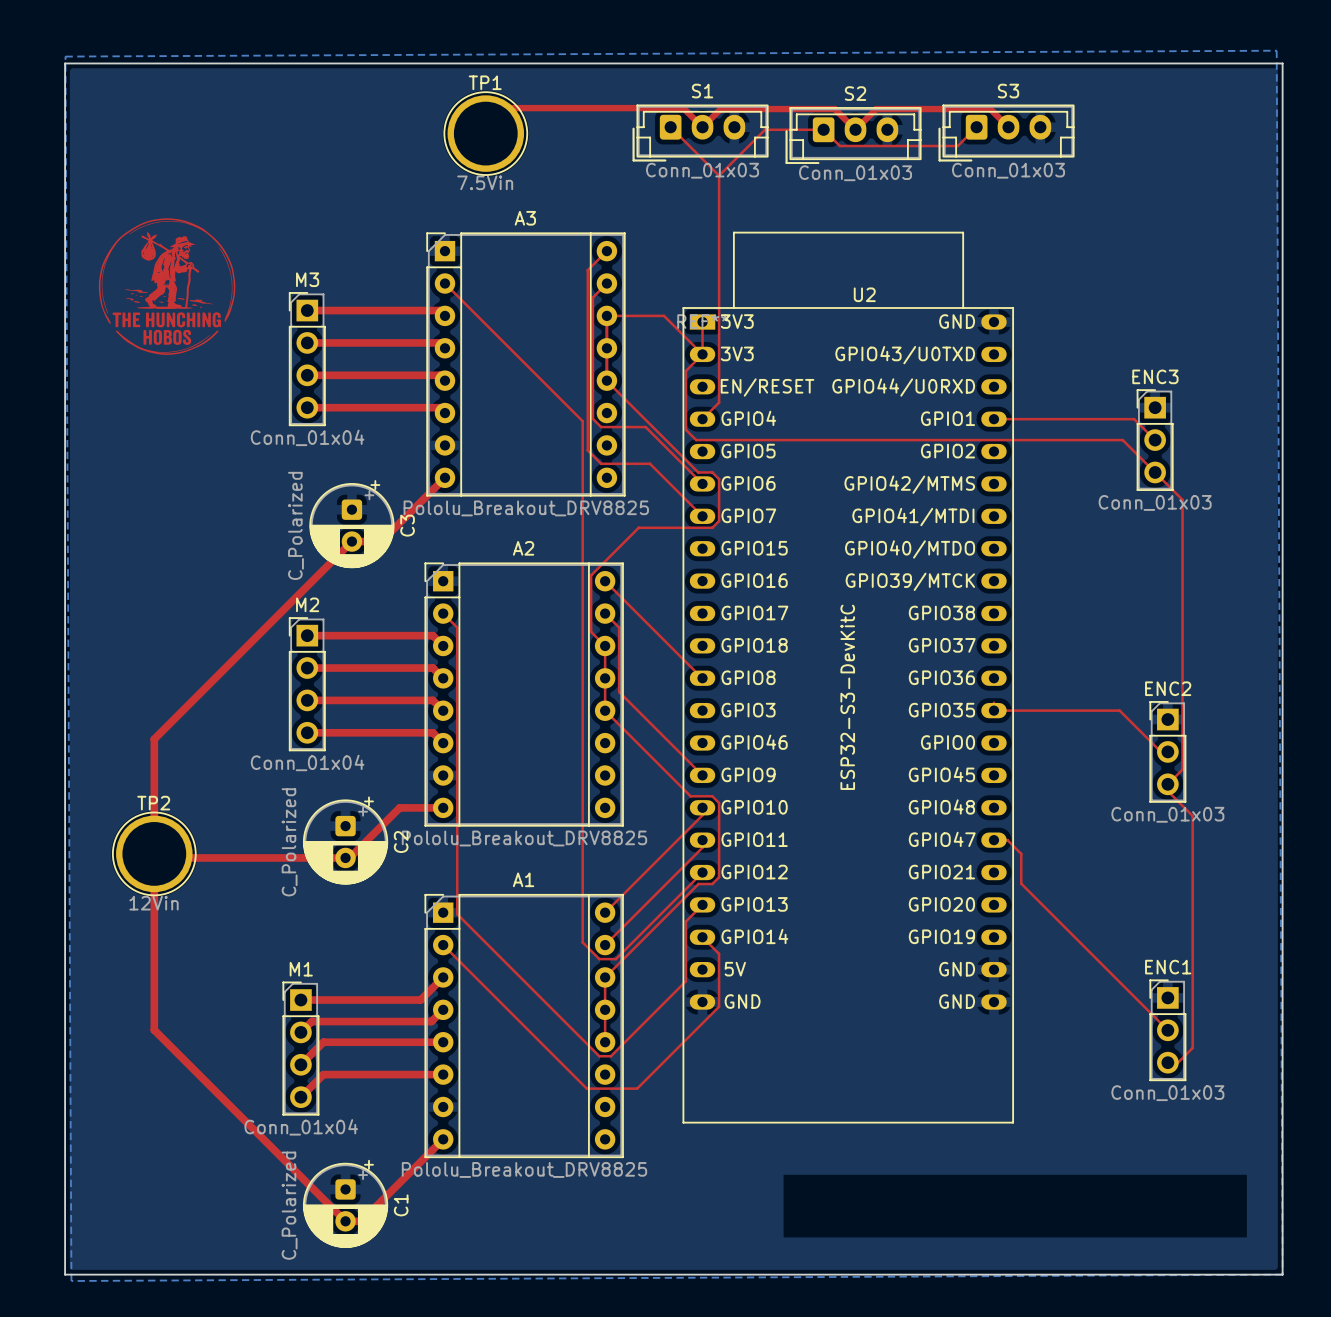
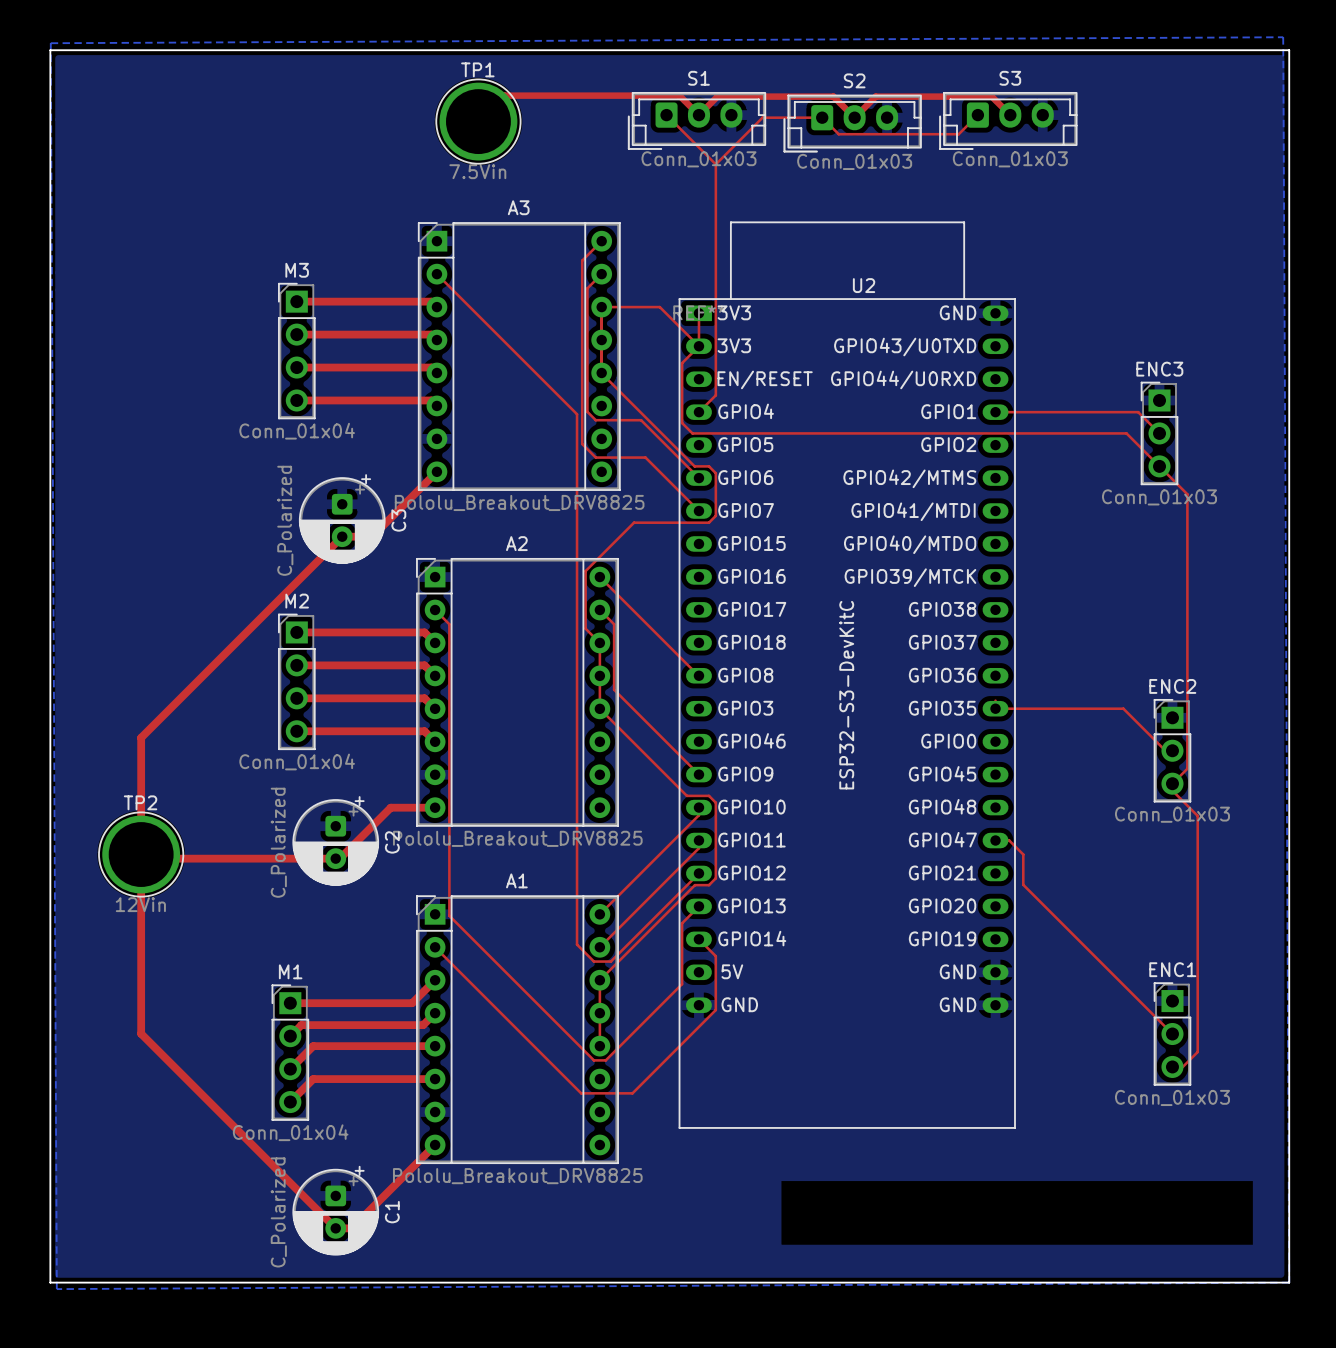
drawing: [98, 218, 236, 355] -> none

